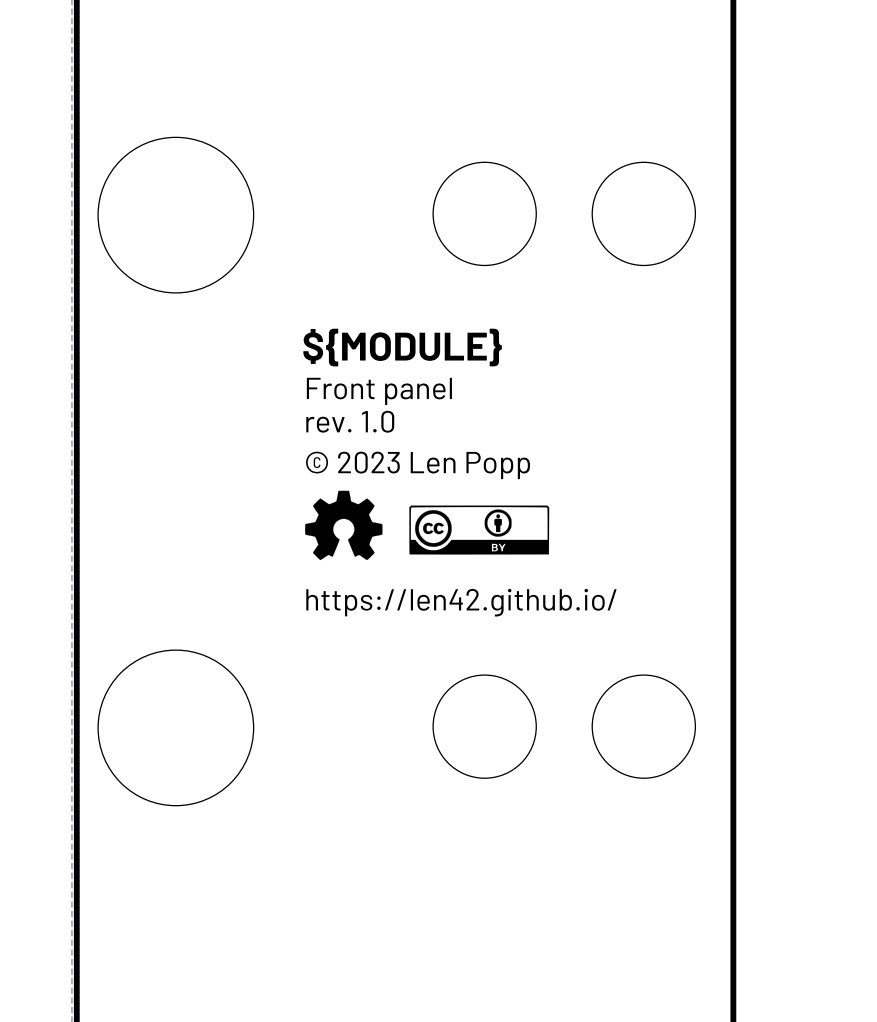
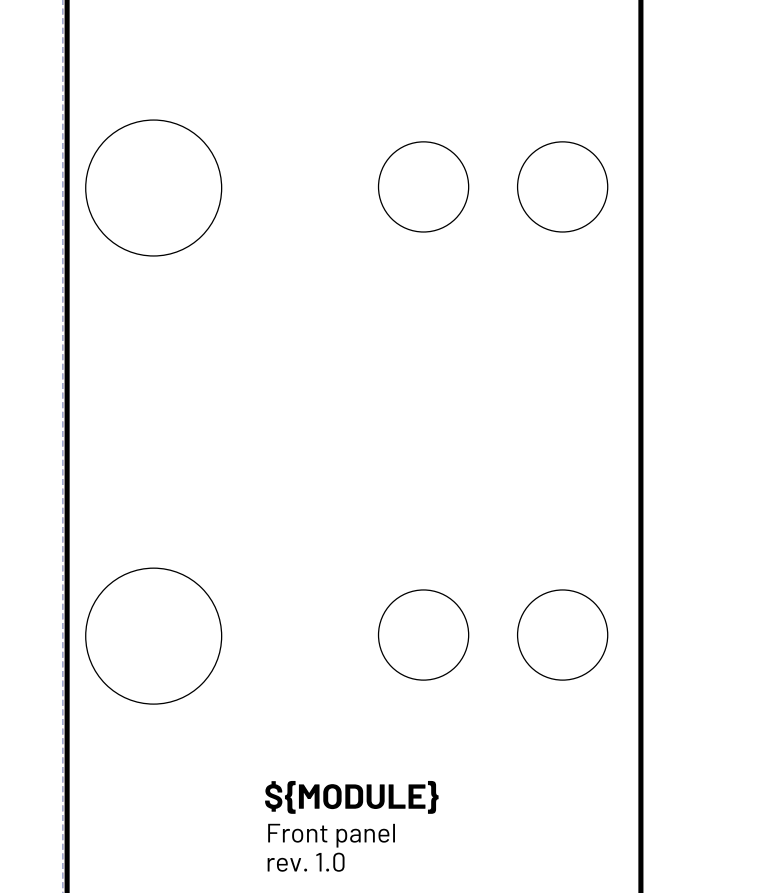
text: ${MODULE} (402, 347) -> none
text: Front panel (379, 391) -> none
text: rev. 1.0 (350, 421) -> none
text: © 2023 Len Popp (418, 465) -> none
drawing: [305, 490, 383, 561] -> none
drawing: [409, 505, 550, 555] -> none
text: https://len42.github.io/ (461, 602) -> none
text: none -> ${MODULE} (351, 797)
text: none -> Front panel (331, 835)
text: none -> rev. 1.0 (306, 862)

